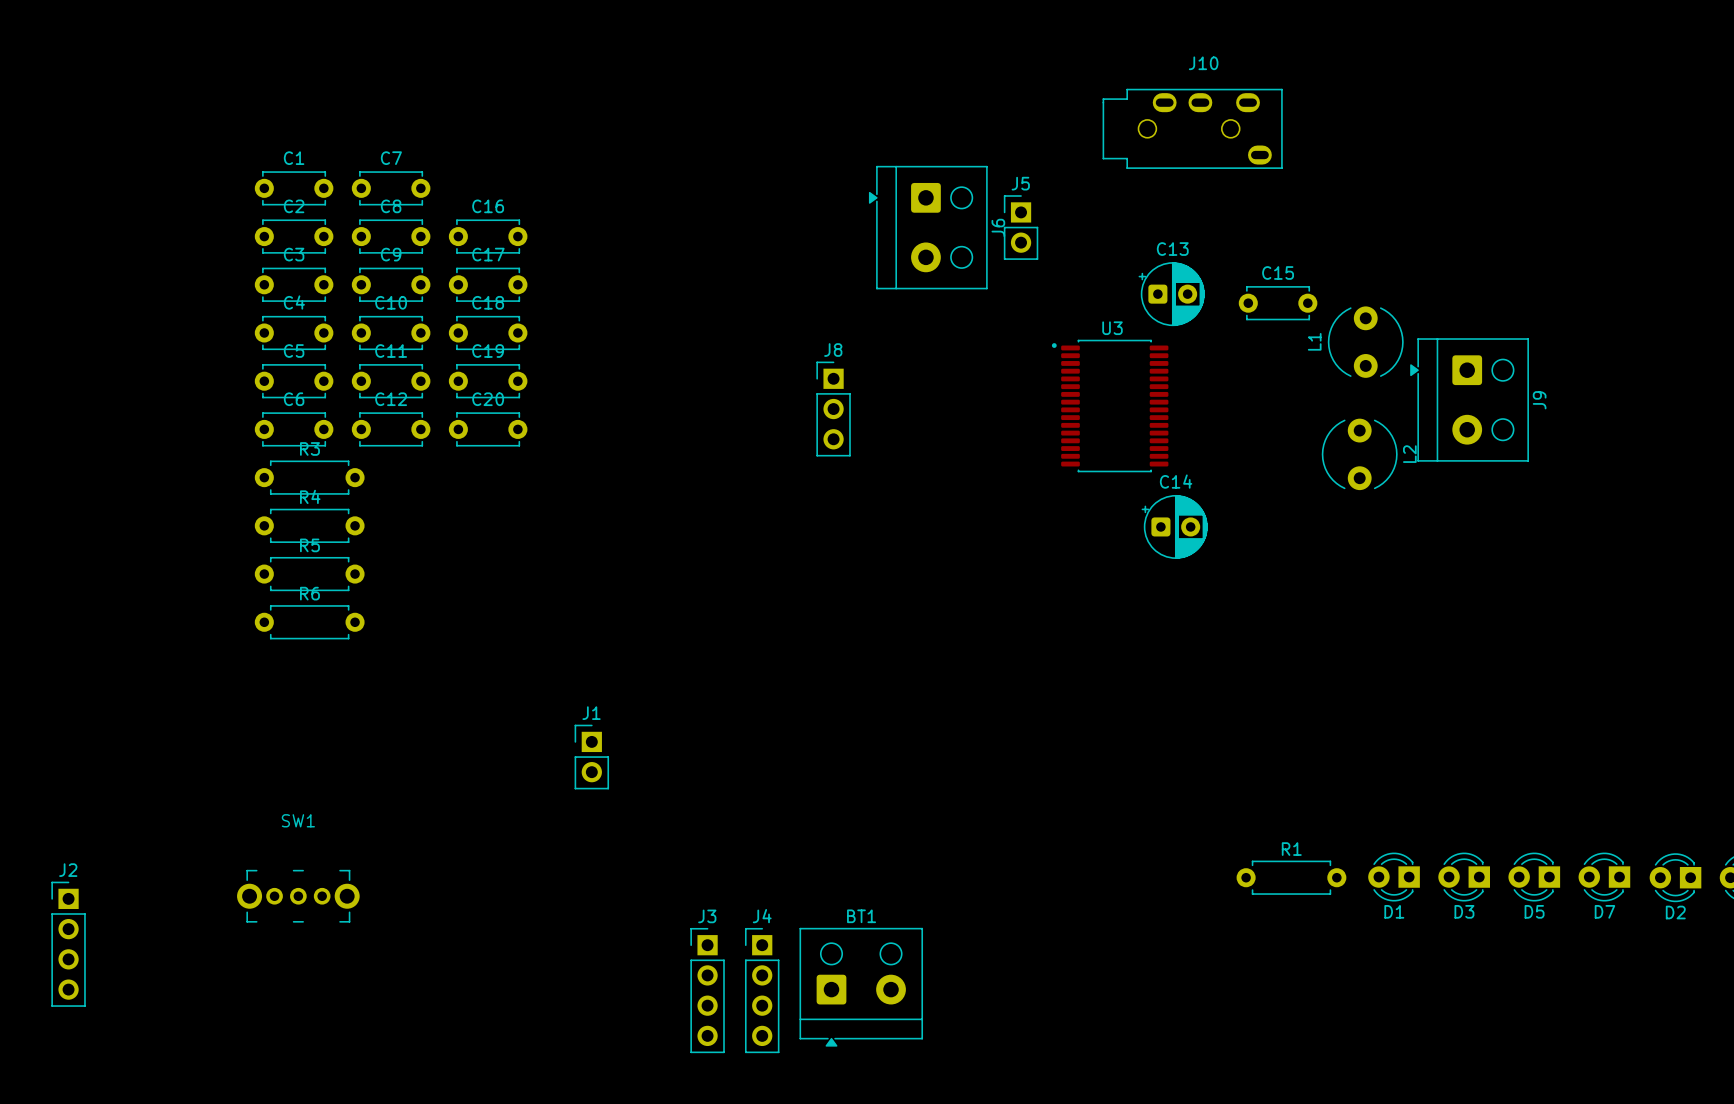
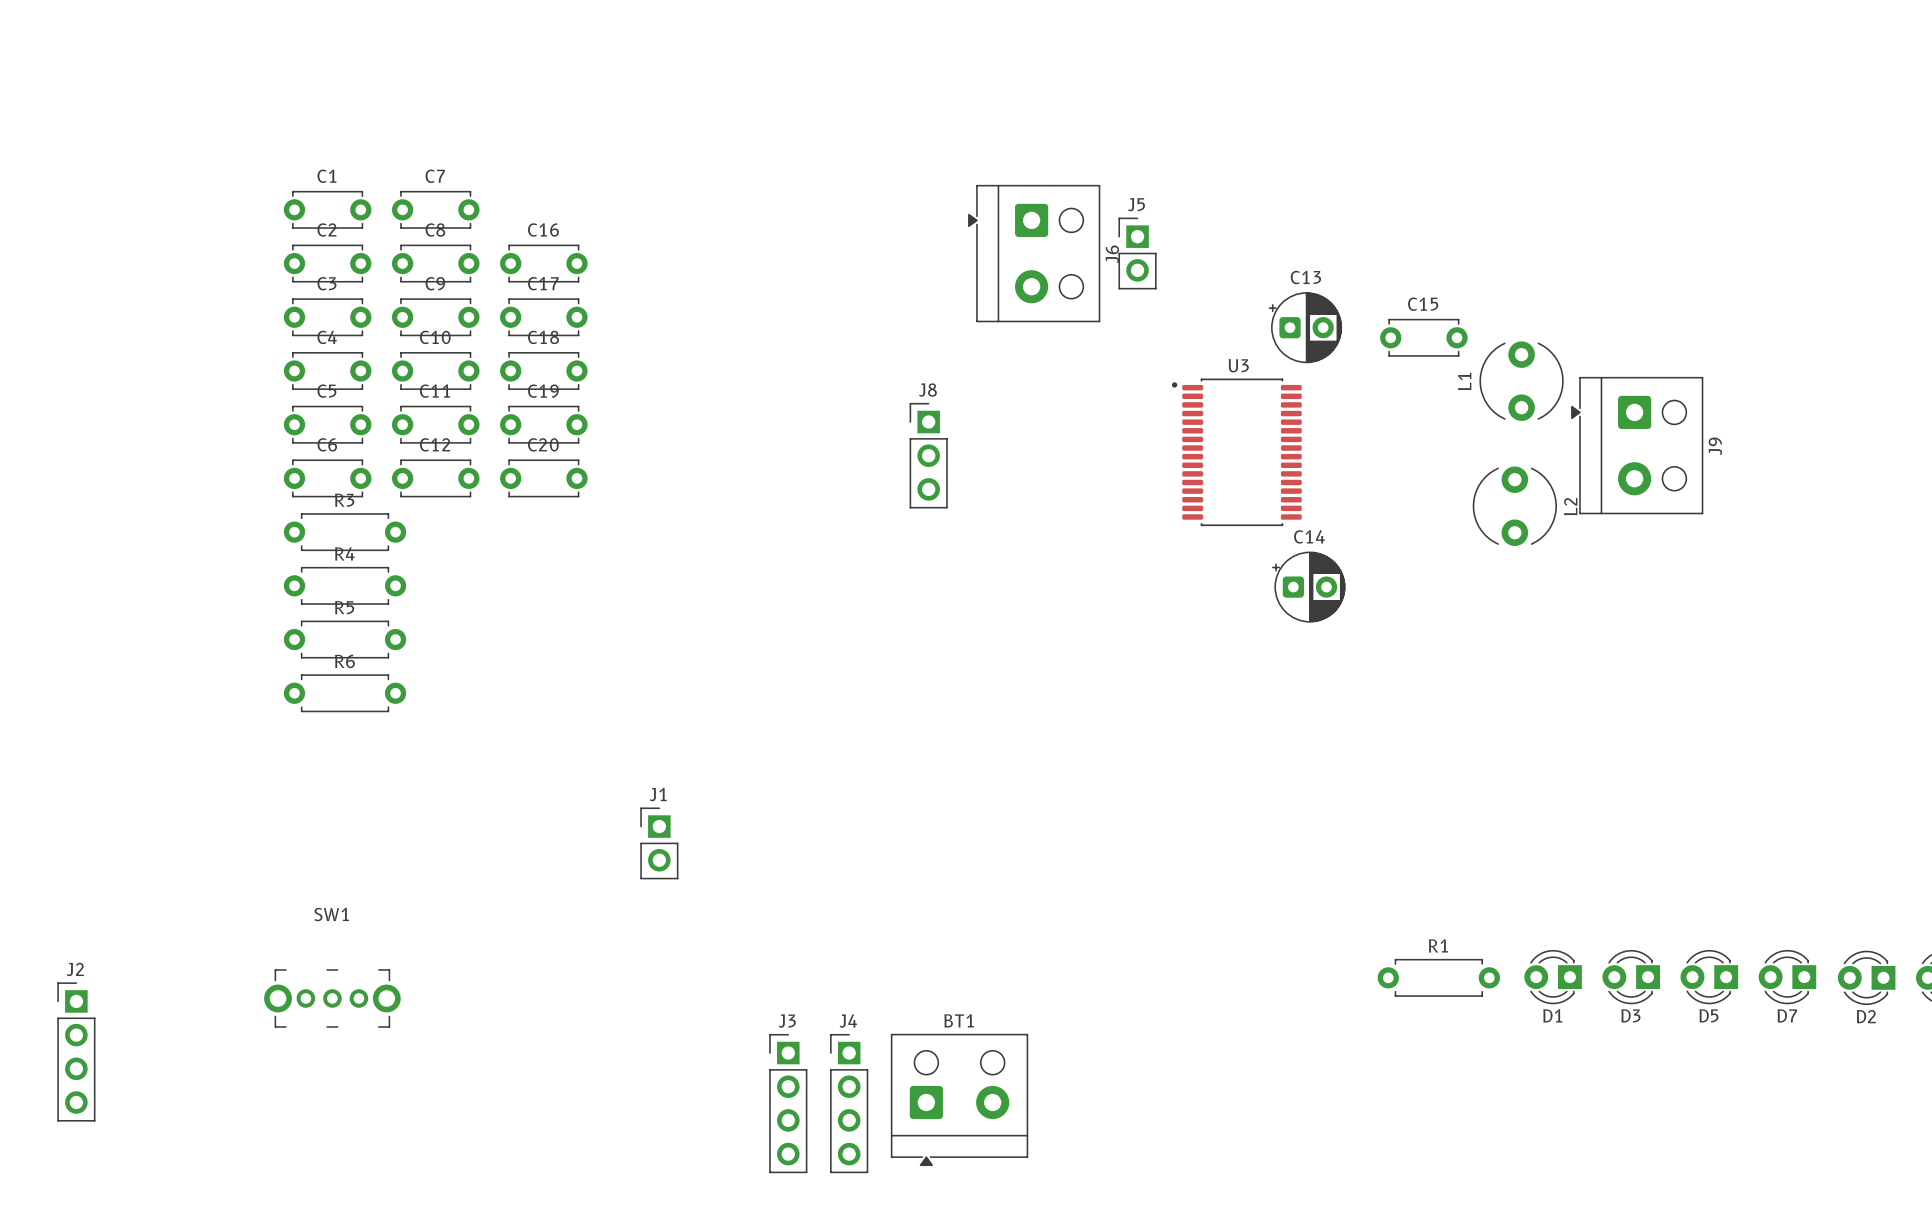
J10: (1192, 128) -> none

